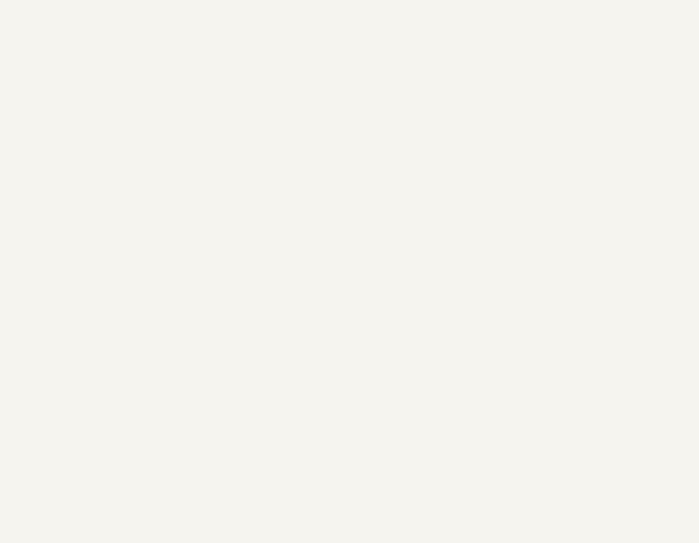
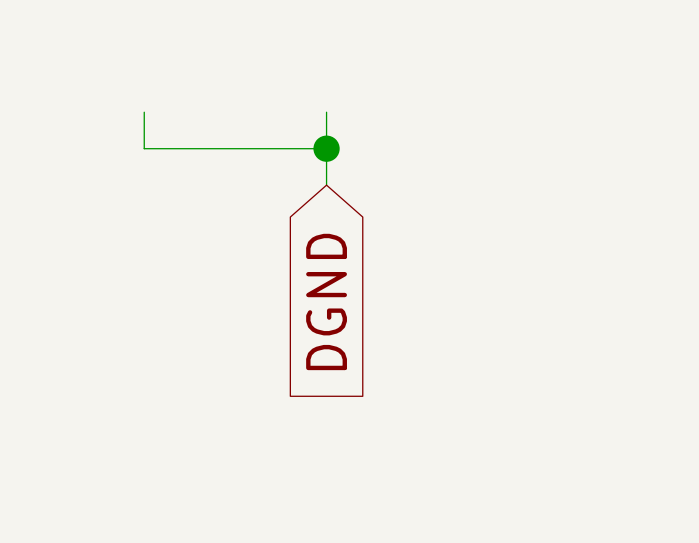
wire: none -> (144, 112) (144, 148) (326, 148)
wire: none -> (326, 112) (326, 185)
junction: none -> (326, 148)
global label: none -> DGND (326, 301)

